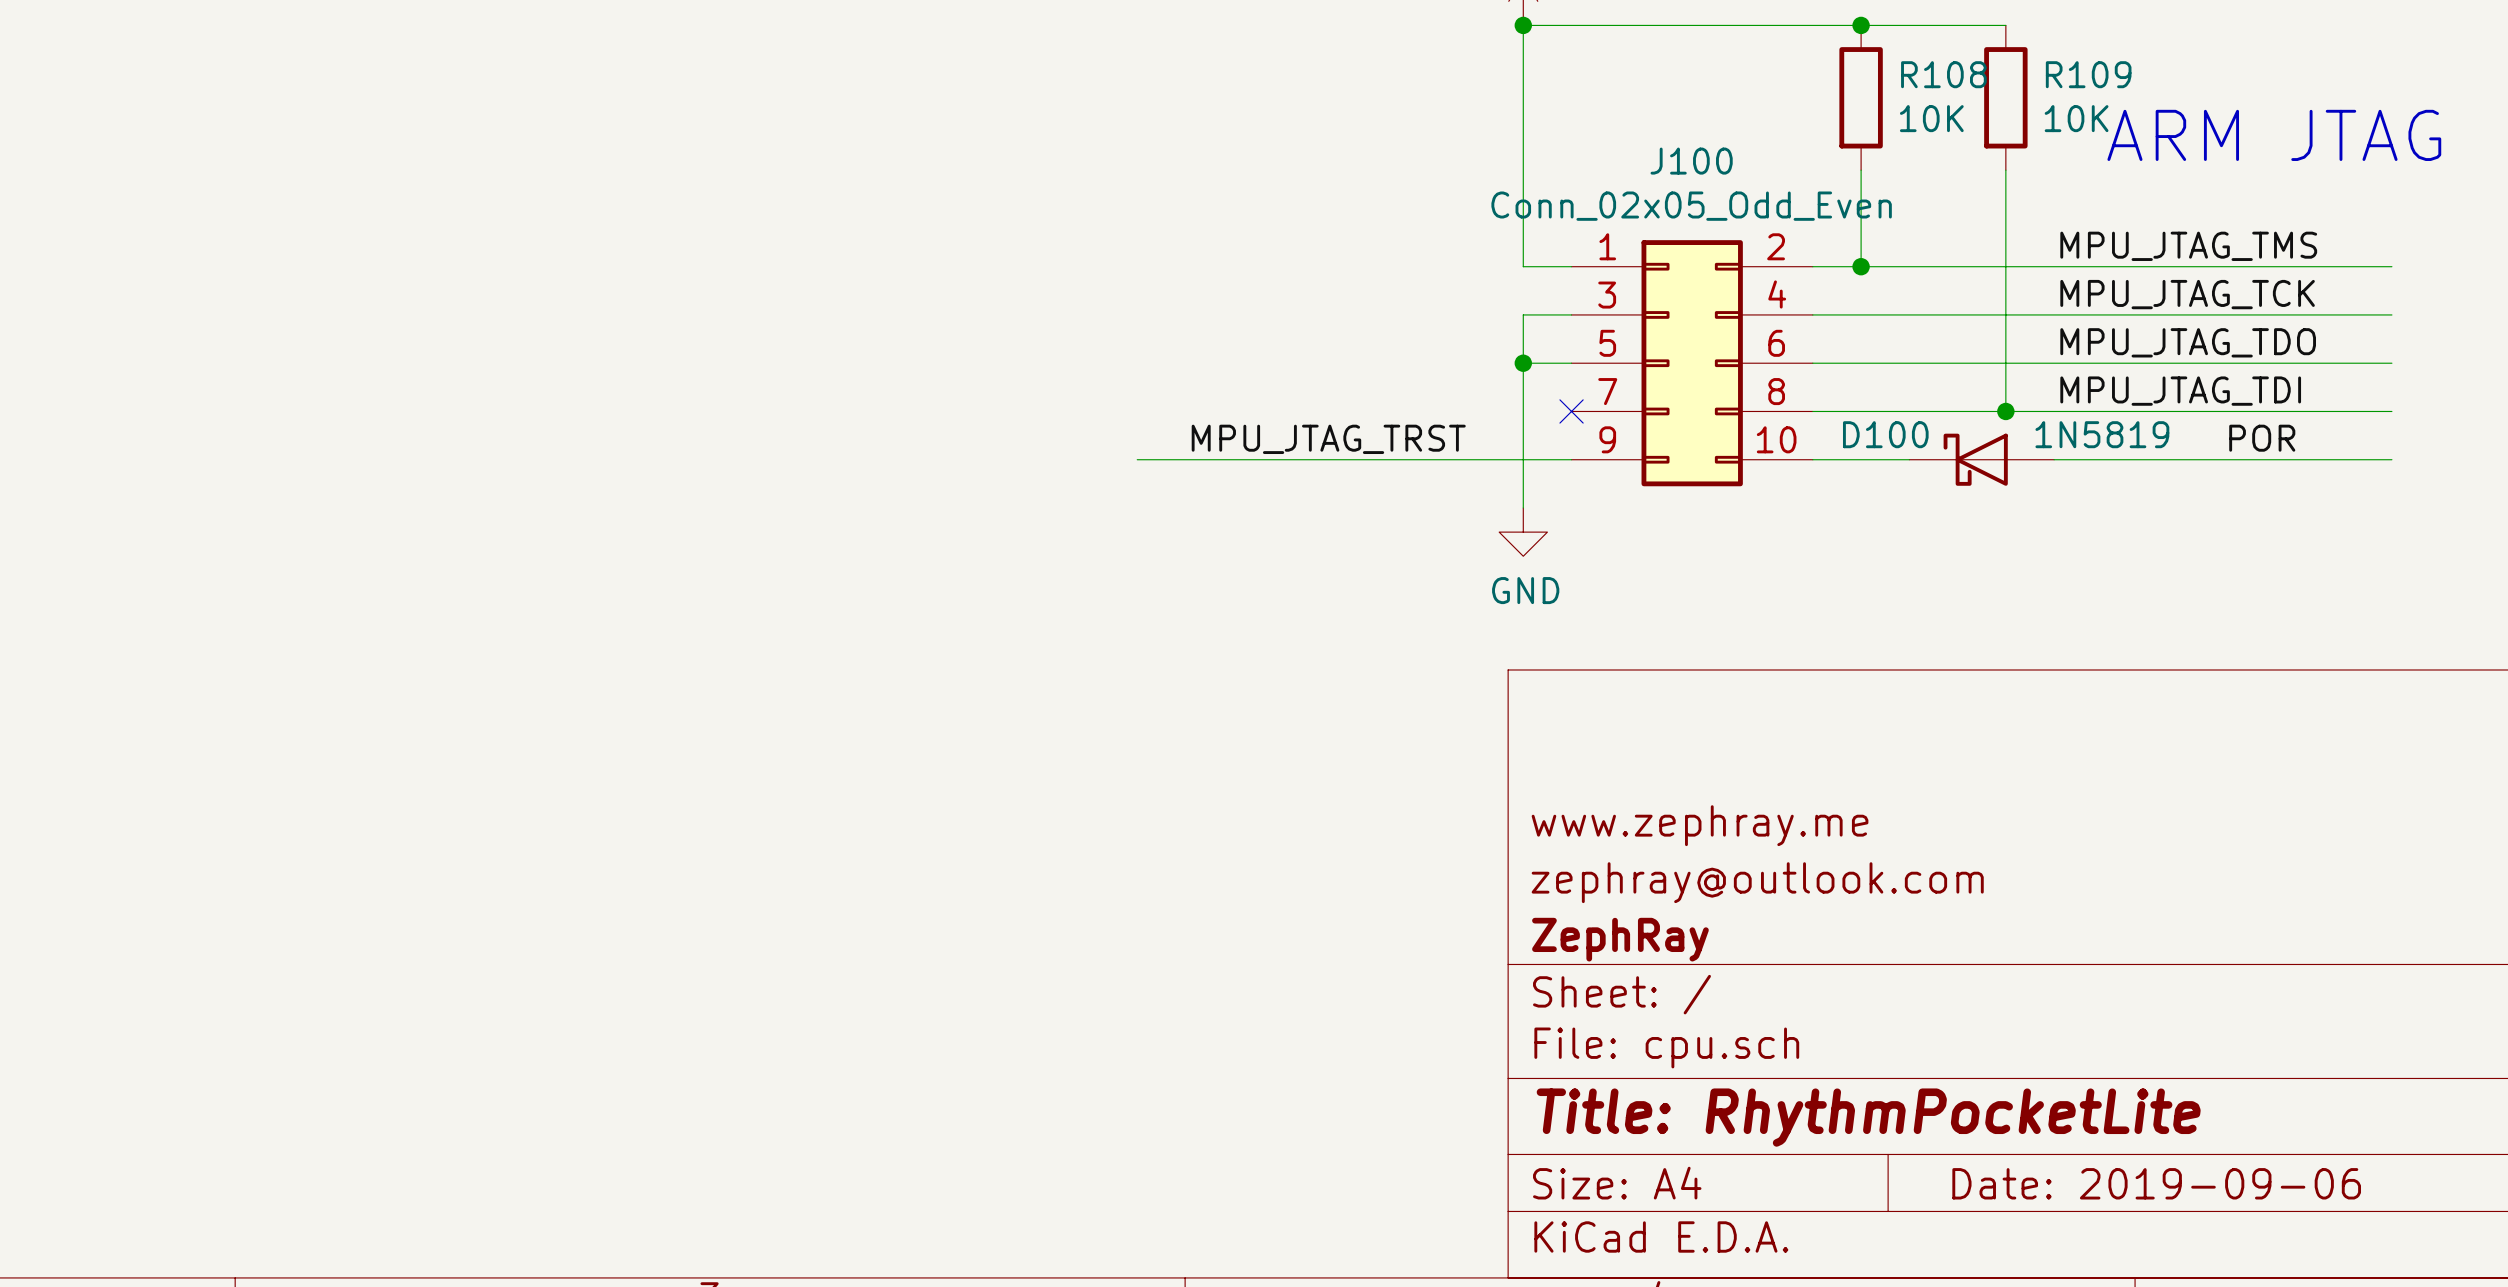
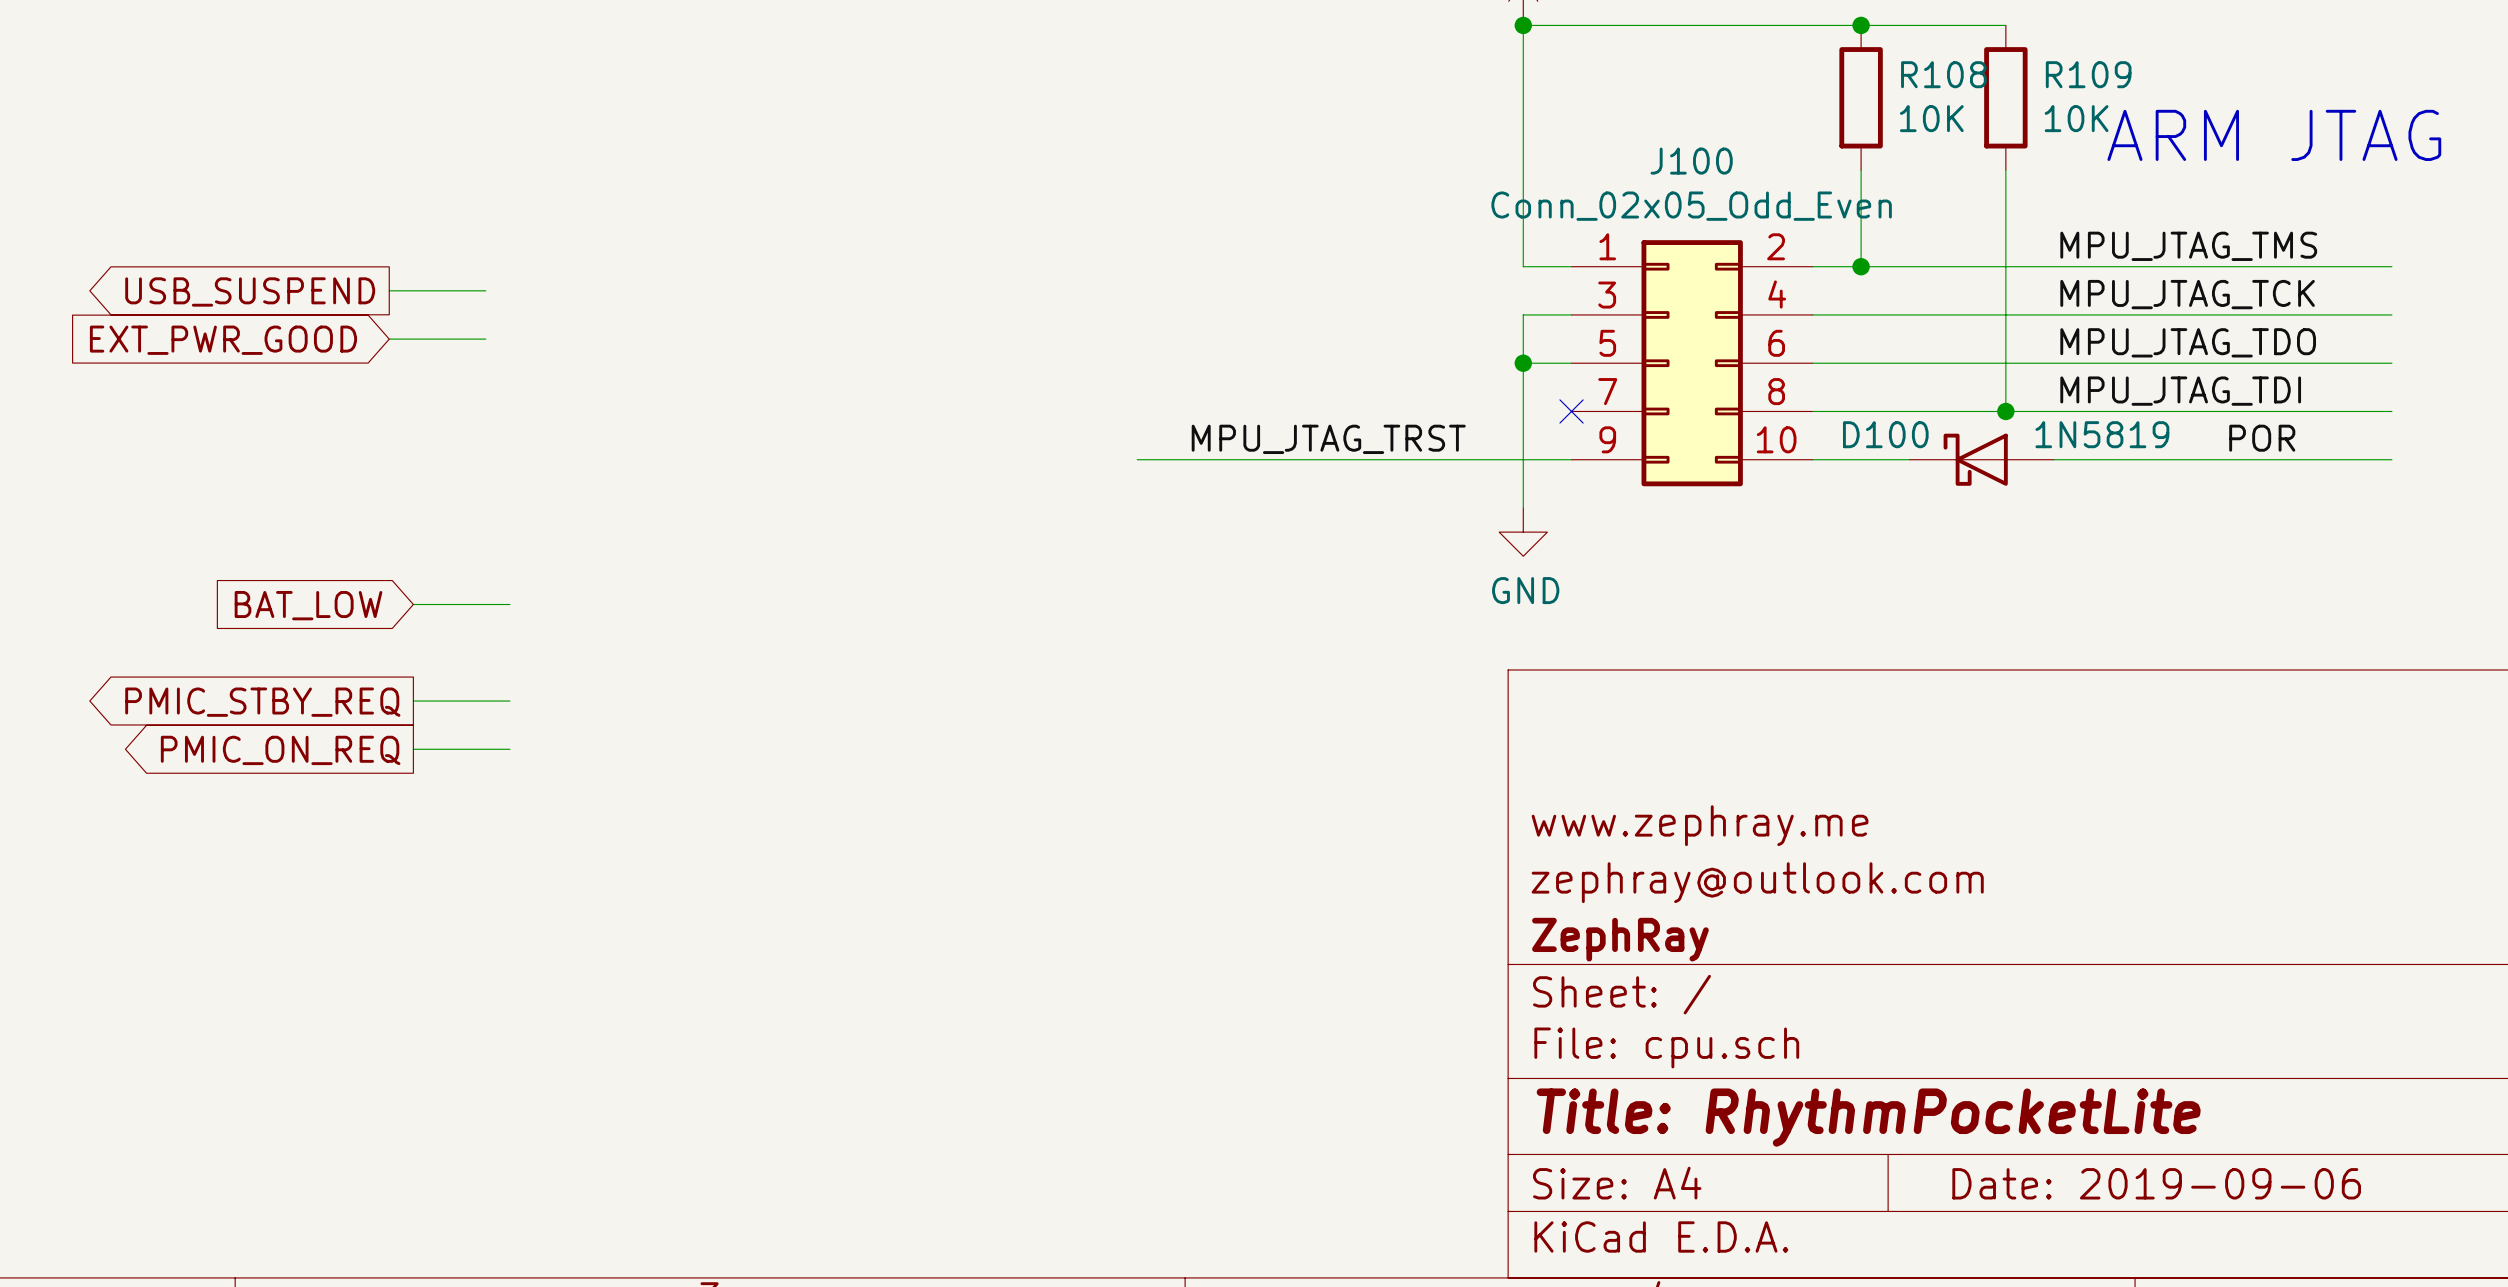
wire: none -> (389, 290) (485, 290)
global label: none -> USB_SUSPEND (250, 291)
wire: none -> (389, 339) (485, 339)
global label: none -> EXT_PWR_GOOD (223, 340)
wire: none -> (413, 604) (509, 604)
global label: none -> BAT_LOW (308, 605)
wire: none -> (413, 701) (509, 701)
global label: none -> PMIC_STBY_REQ (262, 702)
wire: none -> (413, 749) (509, 749)
global label: none -> PMIC_ON_REQ (280, 750)

